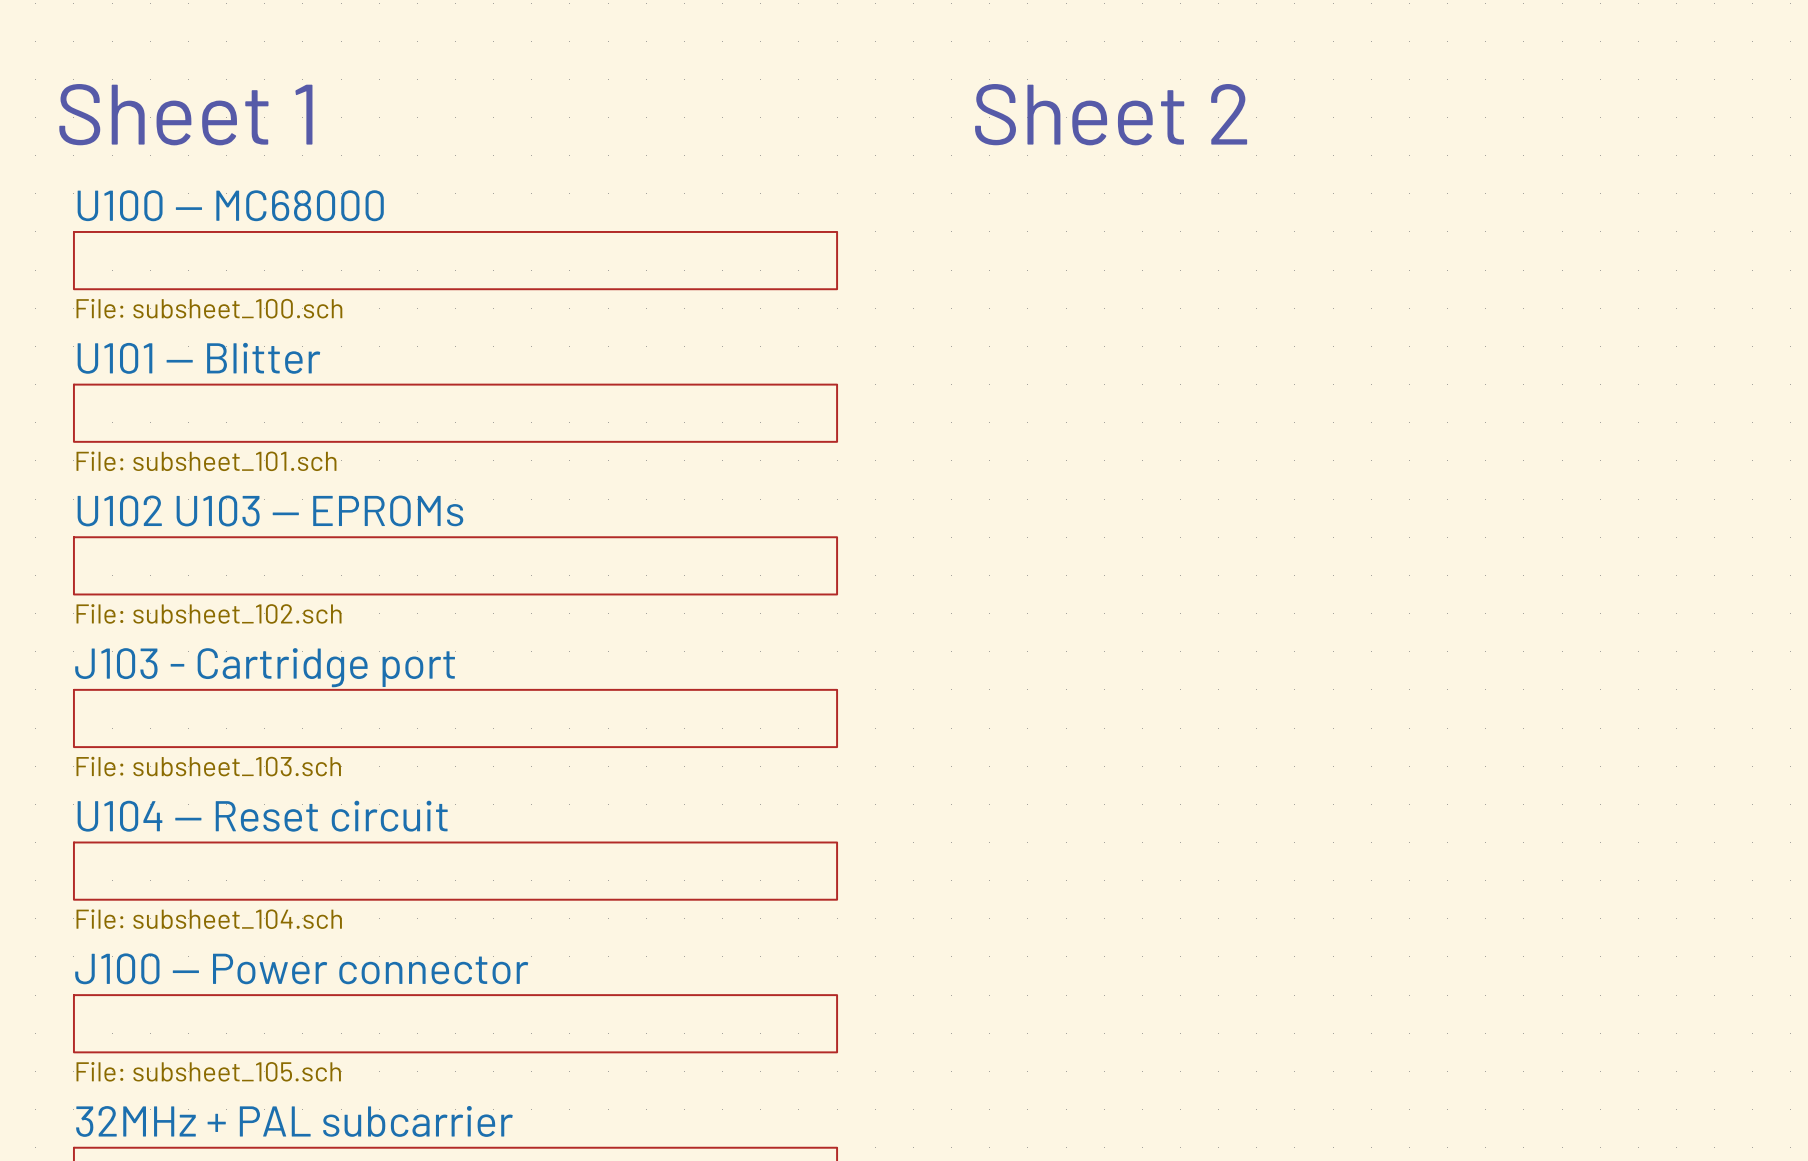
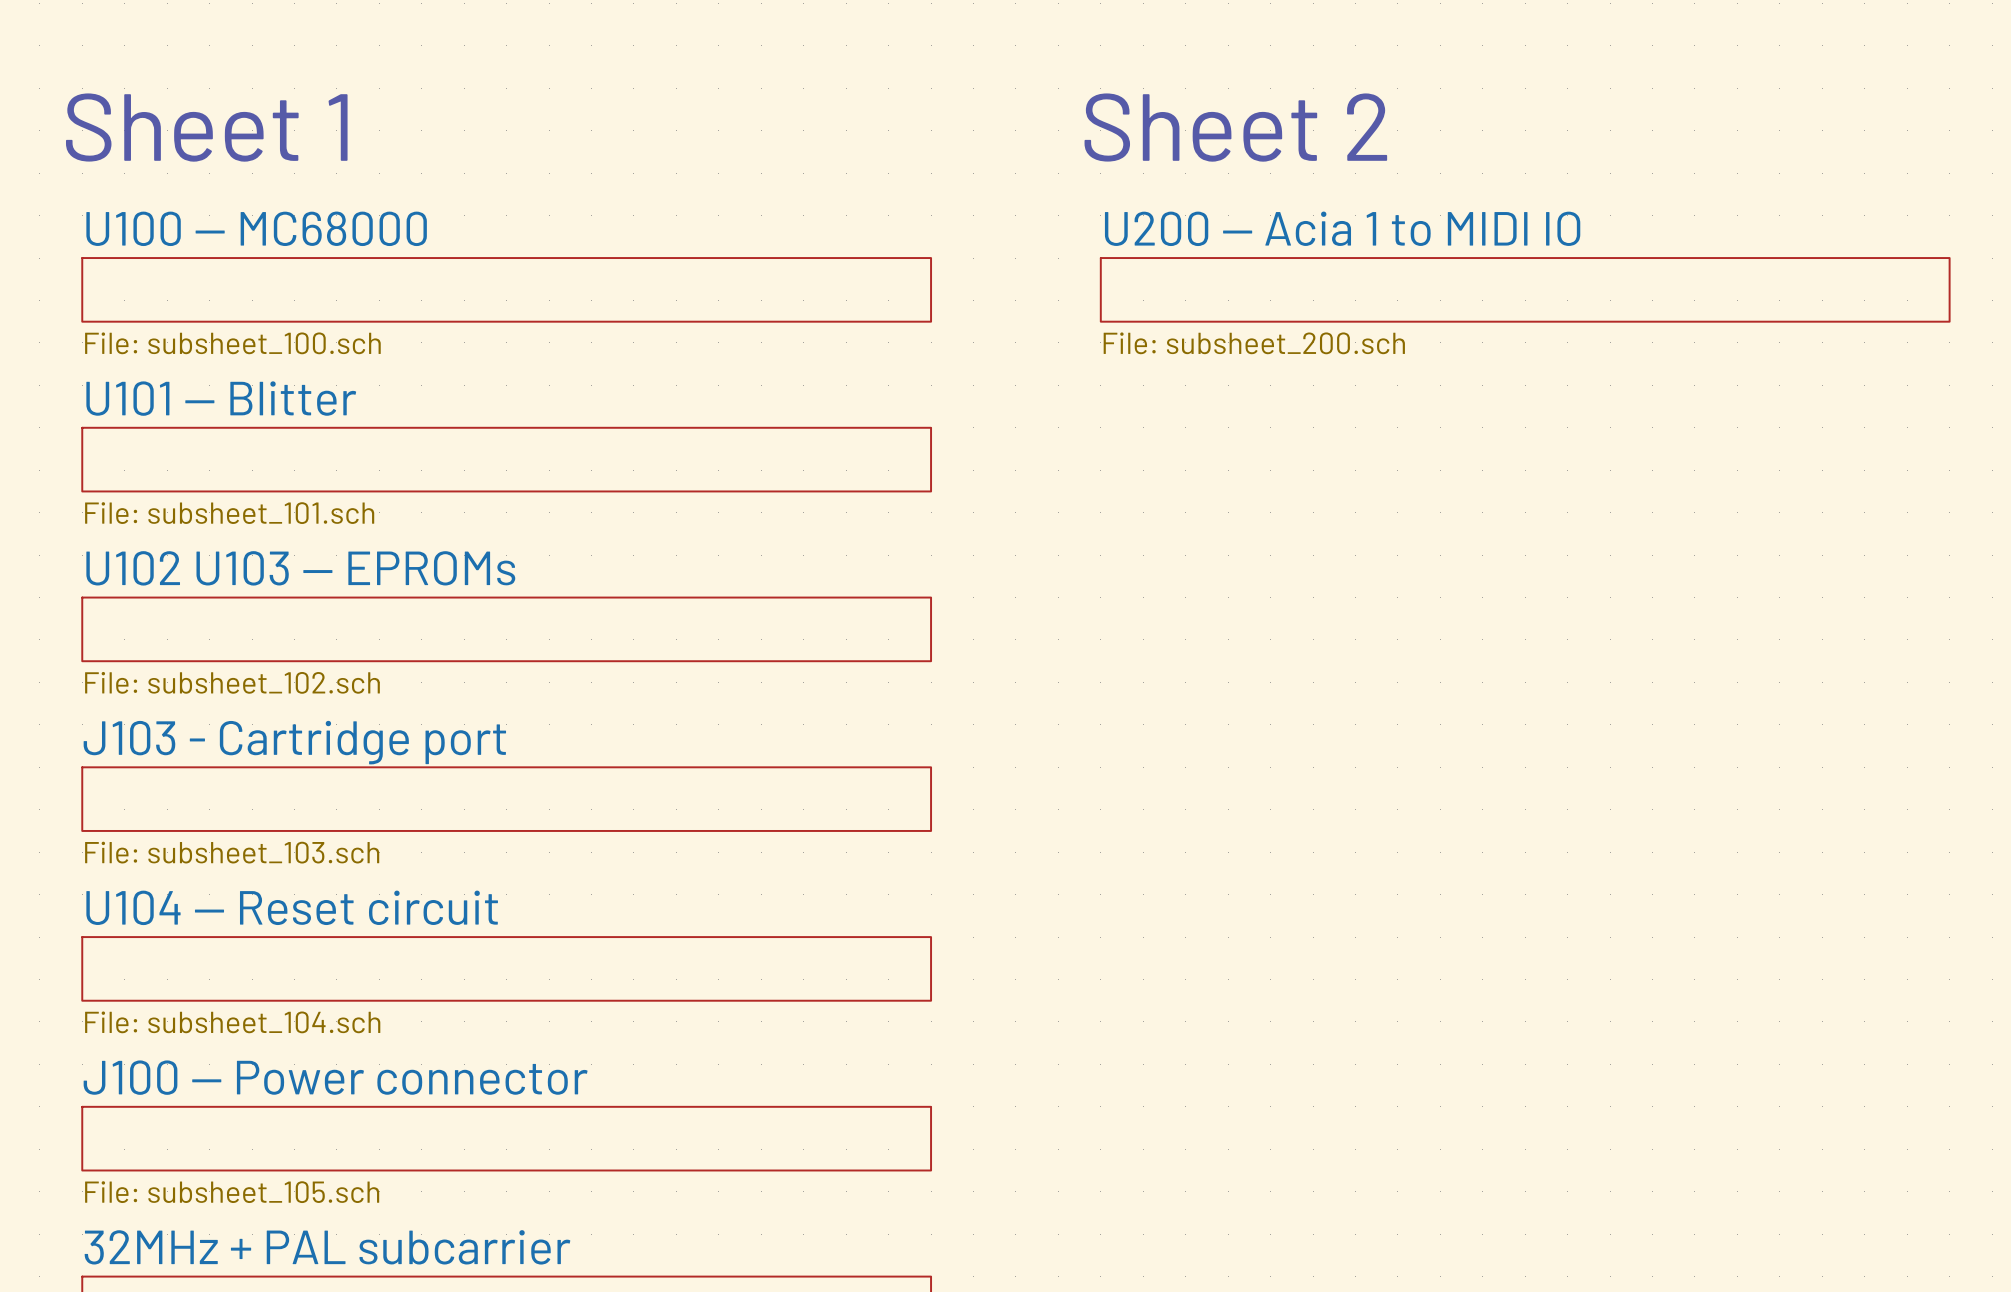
sheet U200 — Acia 1 to MIDI IO: none -> File: subsheet_200.sch (1525, 289)

